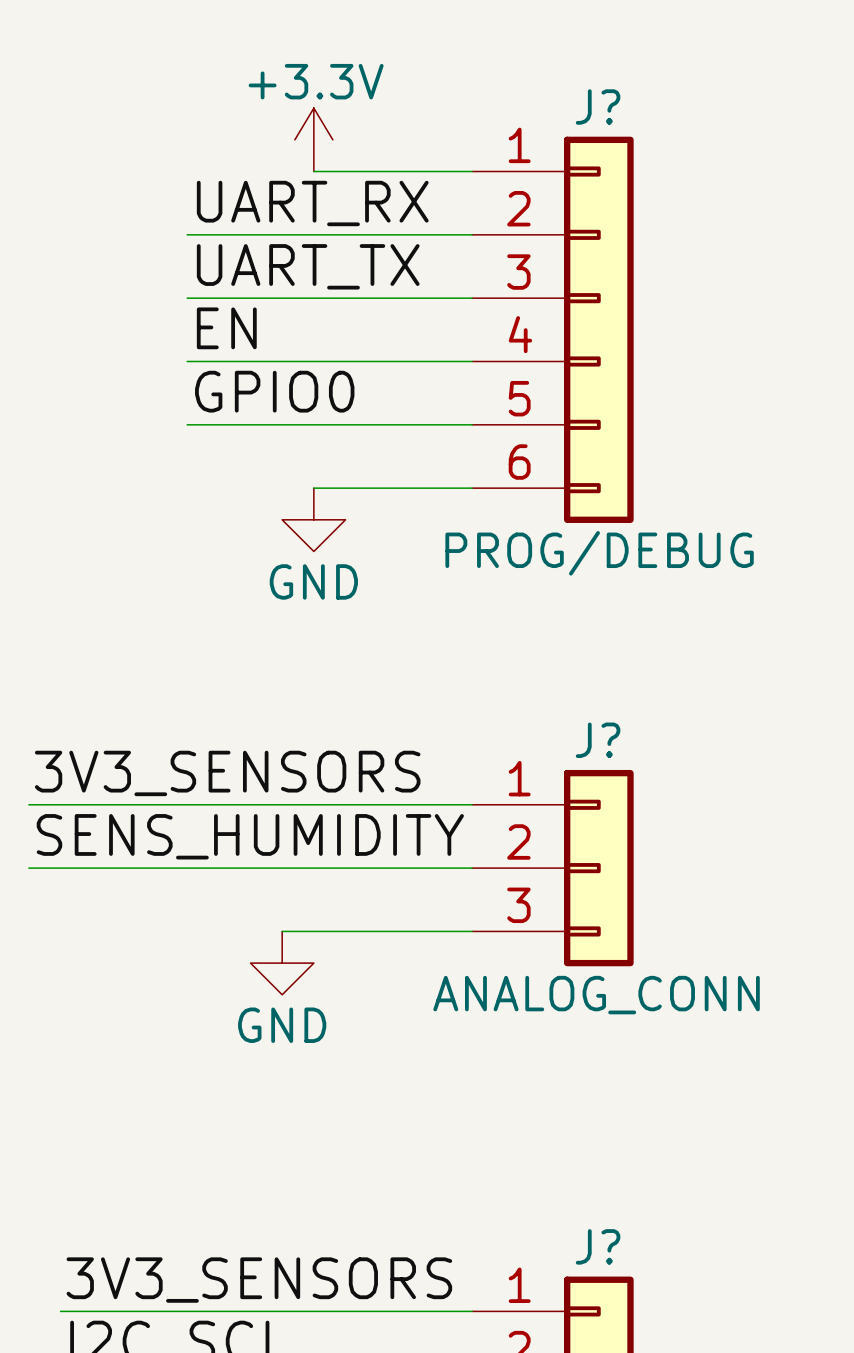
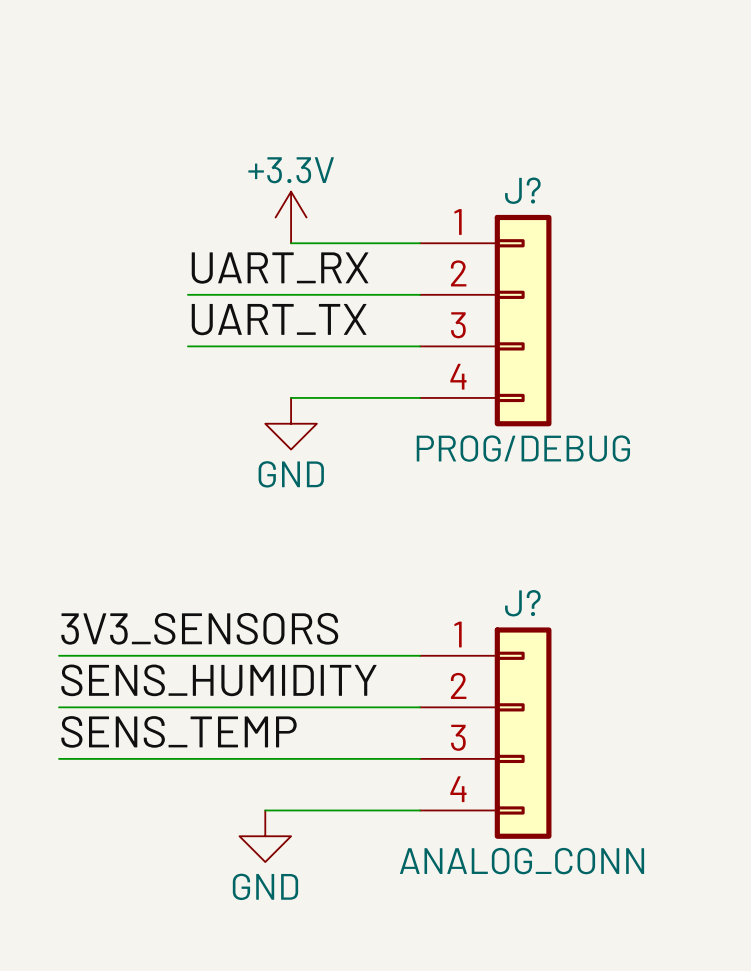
power symbol position: +3.3V (313, 139) -> +3.3V (291, 217)
wire: (313, 171) (472, 171) -> none
label: UART_RX (312, 203) -> none
wire: (187, 234) (472, 234) -> none
label: UART_TX (308, 266) -> none
wire: (187, 298) (313, 298) -> none
label: EN (226, 328) -> UART_RX (280, 268)
J?: PROG/DEBUG (552, 329) -> none
label: GPIO0 (274, 391) -> UART_TX (279, 319)
J?: none -> PROG/DEBUG (485, 320)
J?: ANALOG_CONN (552, 868) -> none
J?: none -> ANALOG_CONN (485, 733)
label: none -> SENS_TEMP (179, 731)
wire: none -> (59, 758) (265, 758)
power symbol position: GND (282, 963) -> GND (265, 836)
wire: none -> (265, 810) (419, 810)

